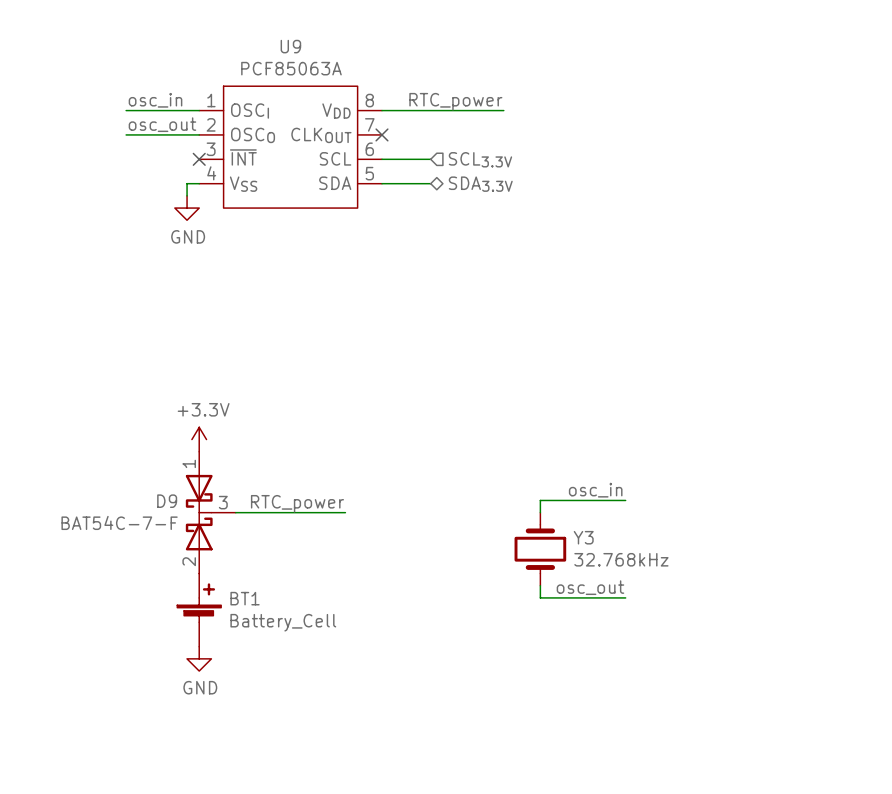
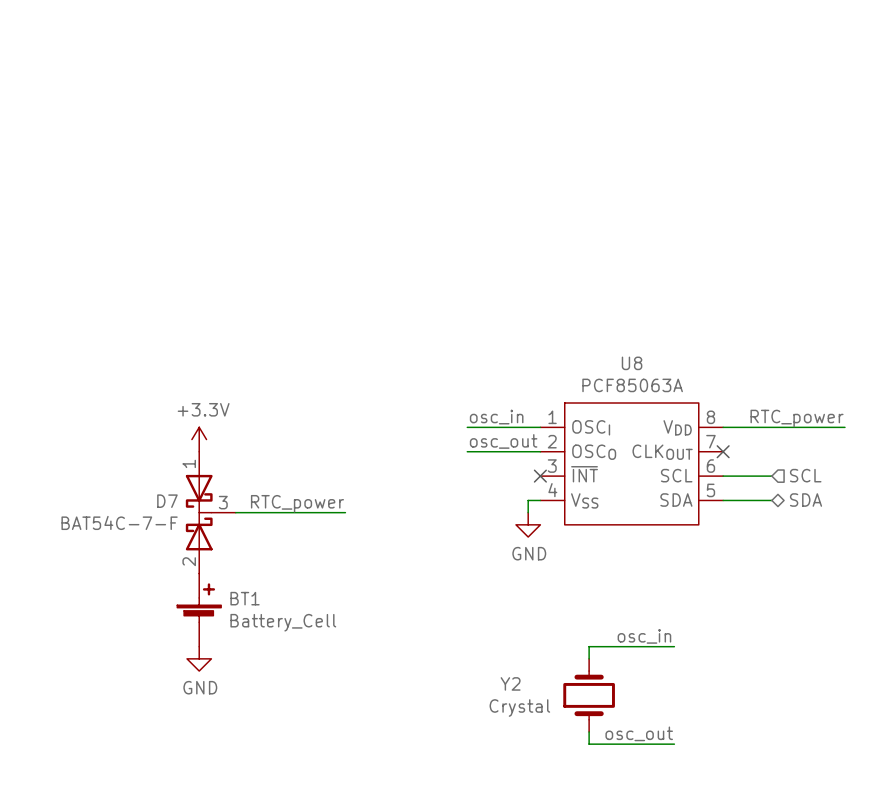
label: osc_in (155, 100) -> none
label: RTC_power (455, 101) -> none
wire: (126, 110) (199, 110) -> none
wire: (381, 110) (503, 110) -> none
label: osc_out (162, 124) -> none
wire: (126, 134) (199, 134) -> none
no-connect mark: (381, 134) -> none
U9: PCF85063A (290, 147) -> none
no-connect mark: (199, 159) -> none
wire: (381, 159) (430, 159) -> none
hierarchical label: SCL3.3V (480, 159) -> none
wire: (199, 183) (187, 183) (187, 195) -> none
wire: (381, 183) (430, 183) -> none
hierarchical label: SDA3.3V (480, 184) -> none
power symbol: GND (187, 208) -> none
label: none -> osc_in (496, 417)
label: none -> RTC_power (797, 418)
wire: none -> (467, 427) (540, 427)
wire: none -> (723, 427) (844, 427)
label: none -> osc_out (503, 441)
wire: none -> (467, 451) (540, 451)
no-connect mark: none -> (723, 451)
U8: none -> PCF85063A (631, 463)
hierarchical label: none -> SCL (805, 475)
no-connect mark: none -> (540, 476)
wire: none -> (723, 476) (771, 476)
label: osc_in (595, 490) -> none
wire: none -> (540, 500) (528, 500) (528, 512)
wire: (625, 500) (540, 500) (540, 512) -> (674, 646) (589, 646) (589, 658)
wire: none -> (723, 500) (771, 500)
hierarchical label: none -> SDA (806, 500)
D9 name: D9 (167, 501) -> D7 (167, 501)
power symbol: none -> GND (528, 524)
Y3: (540, 549) -> none
wire: (540, 585) (540, 597) (625, 597) -> (589, 731) (589, 744) (674, 744)
label: osc_out (590, 587) -> none
label: none -> osc_in (644, 636)
Y2: none -> Crystal (589, 695)
label: none -> osc_out (639, 733)

